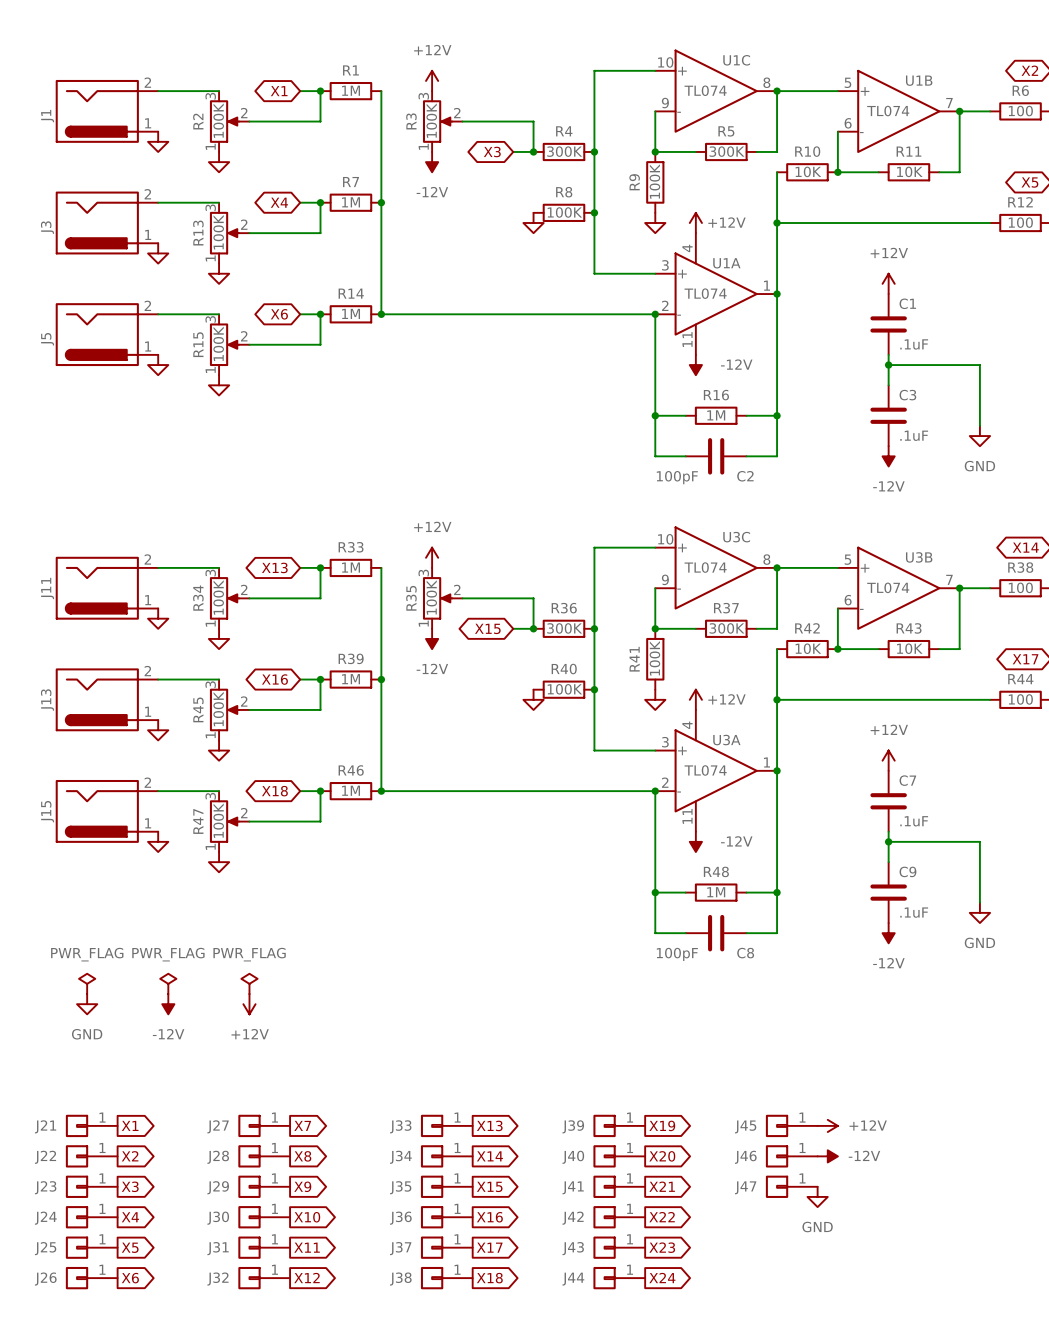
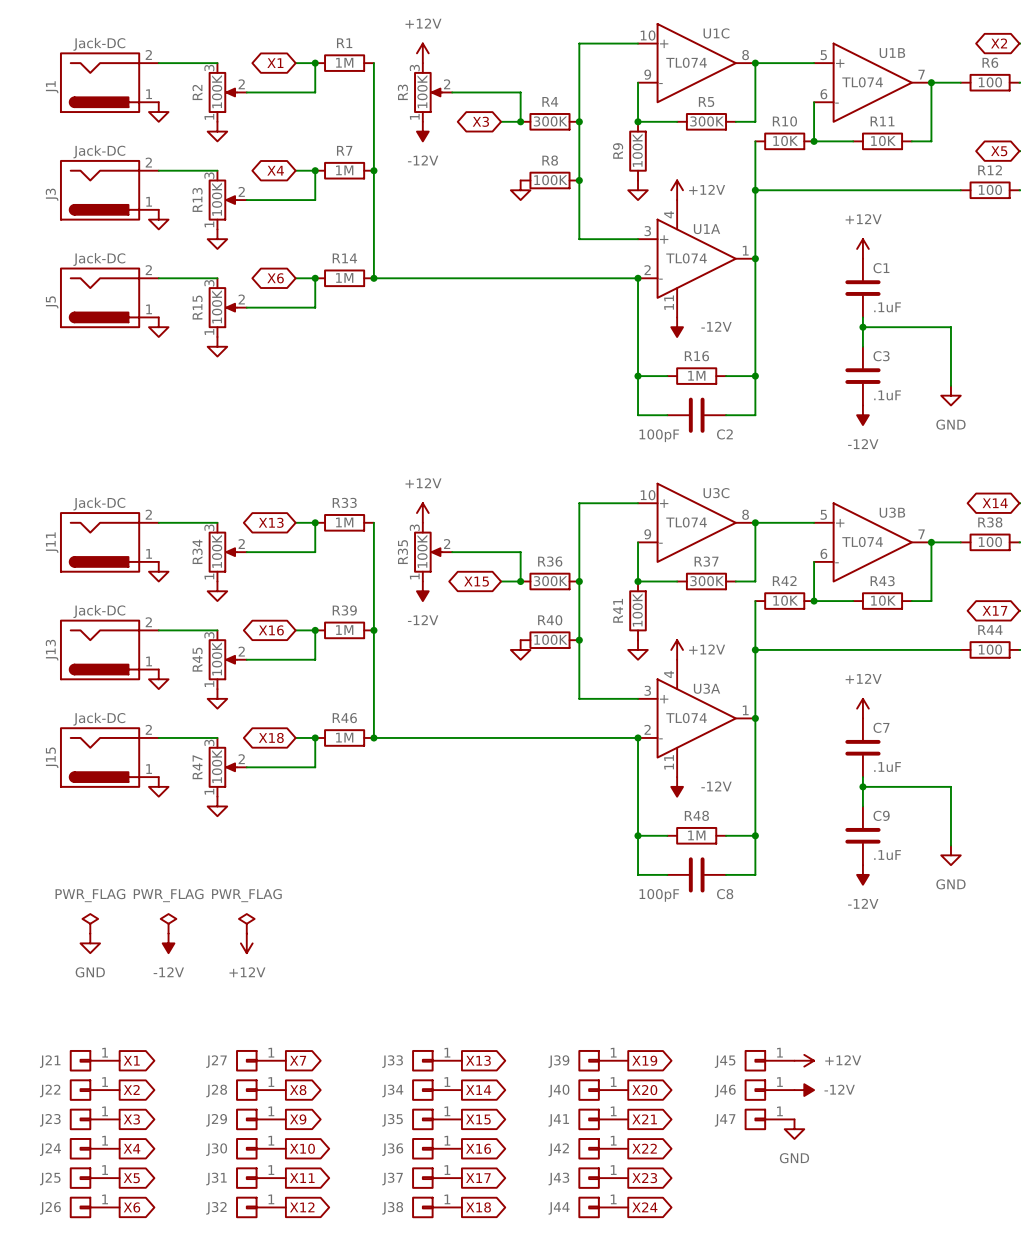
J1 value: none -> Jack-DC (99, 44)
J3 value: none -> Jack-DC (99, 151)
J5 value: none -> Jack-DC (99, 259)
J11 value: none -> Jack-DC (99, 504)
J13 value: none -> Jack-DC (99, 611)
J15 value: none -> Jack-DC (99, 719)

